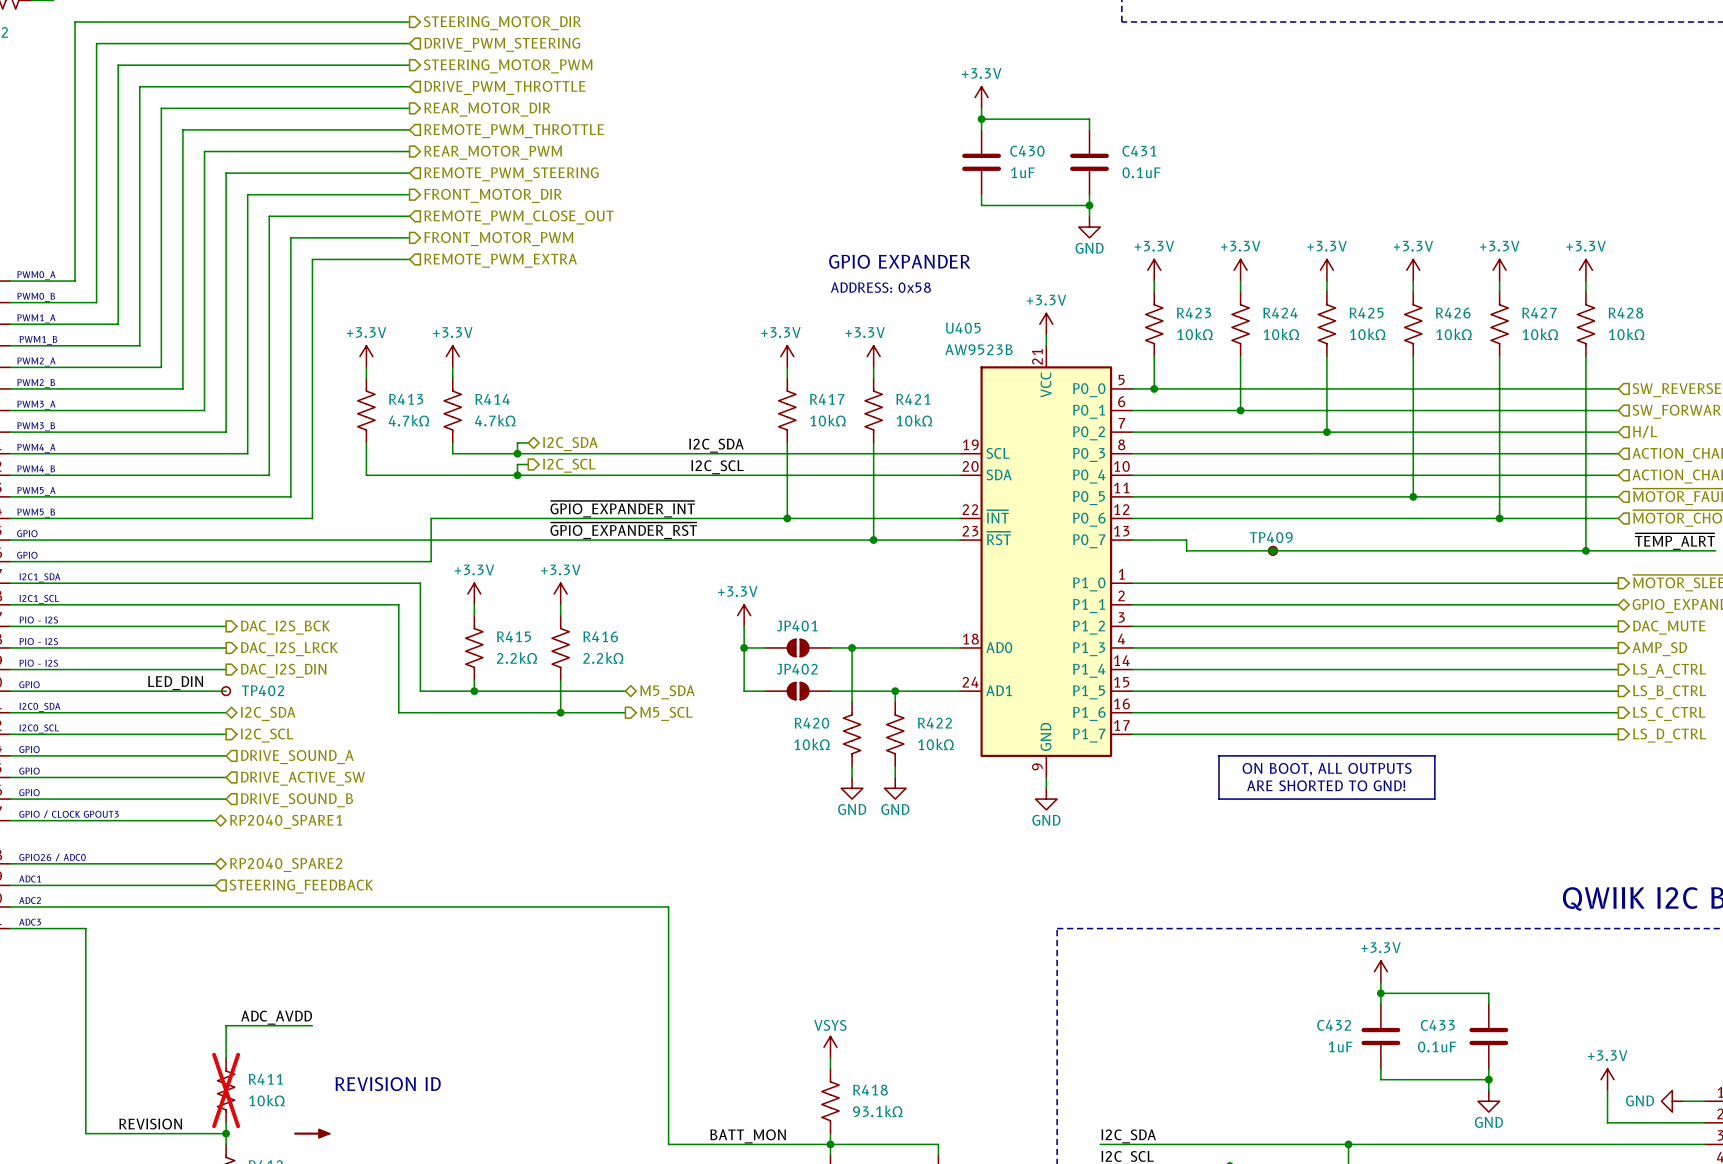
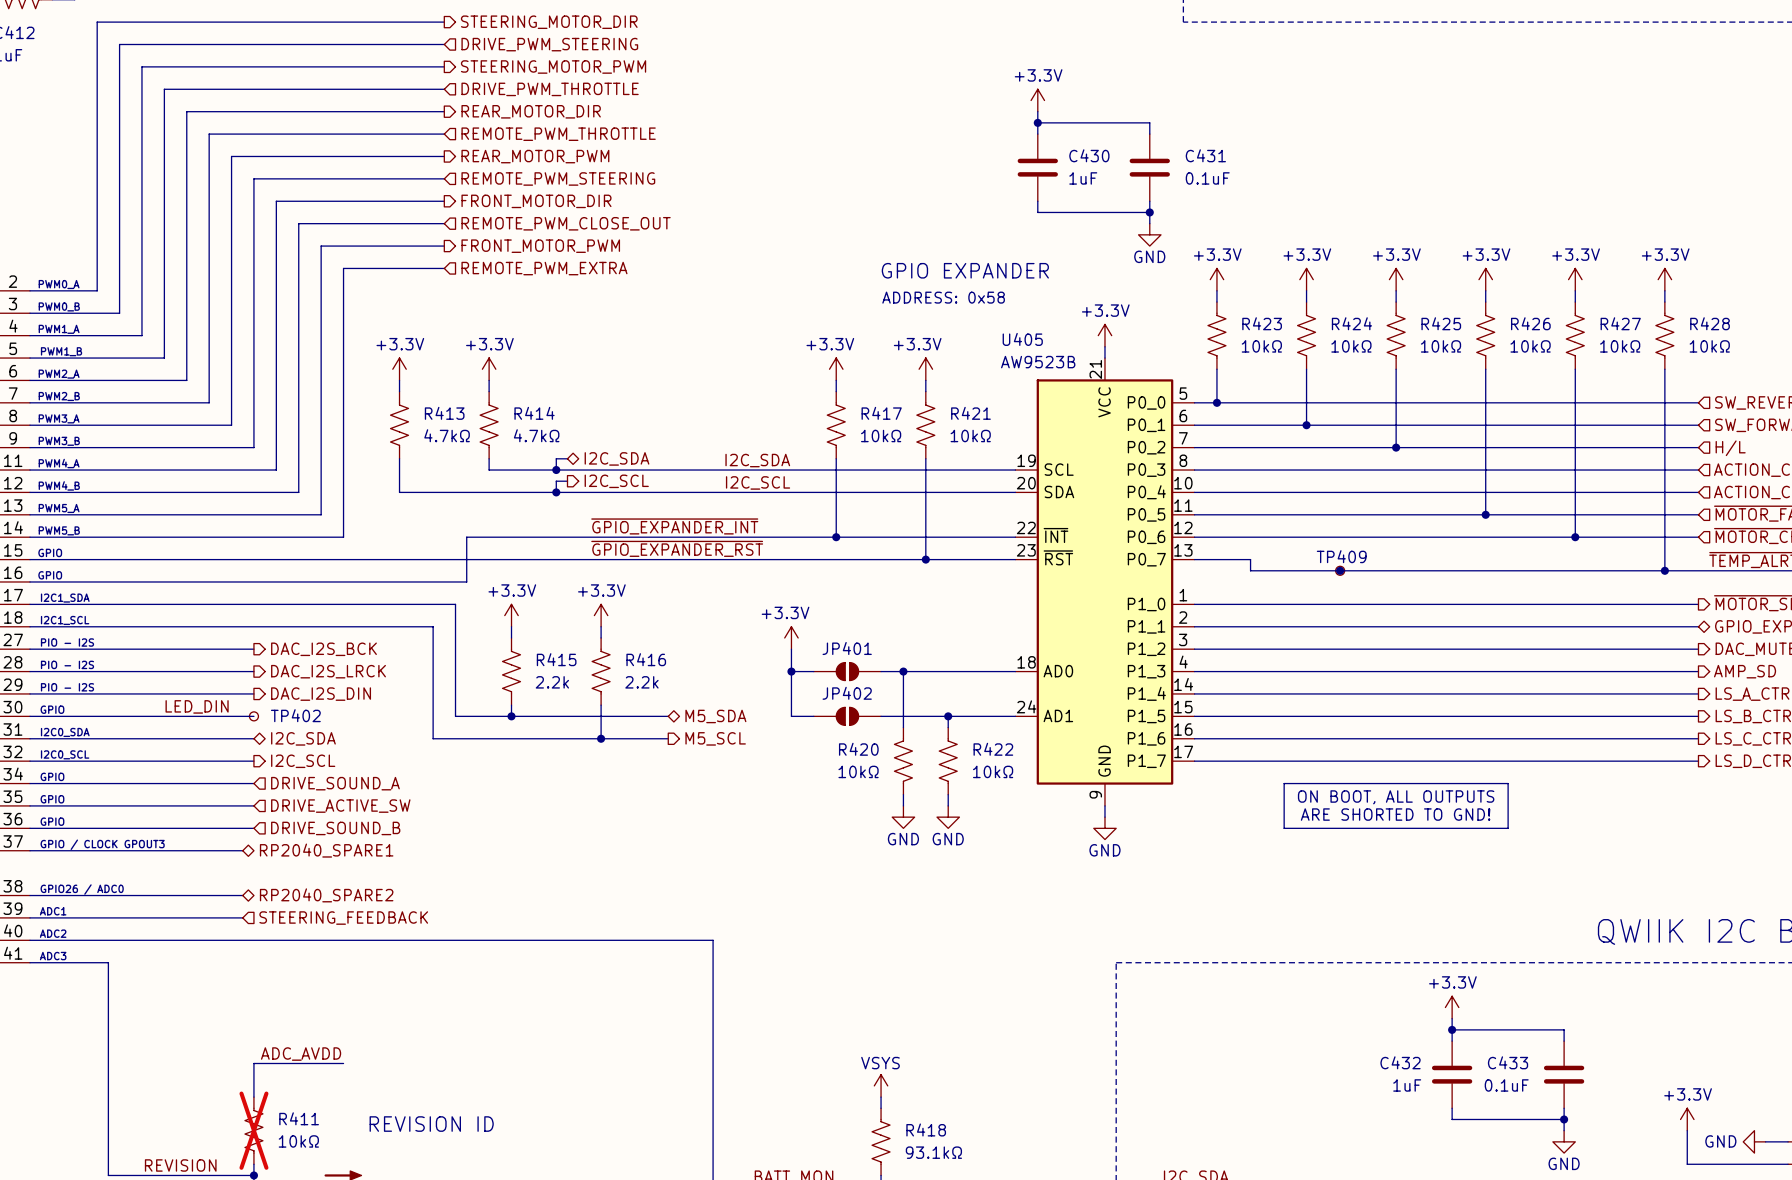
R415 value: 2.2kΩ (517, 658) -> 2.2k (552, 682)
R416 value: 2.2kΩ (603, 658) -> 2.2k (641, 682)

